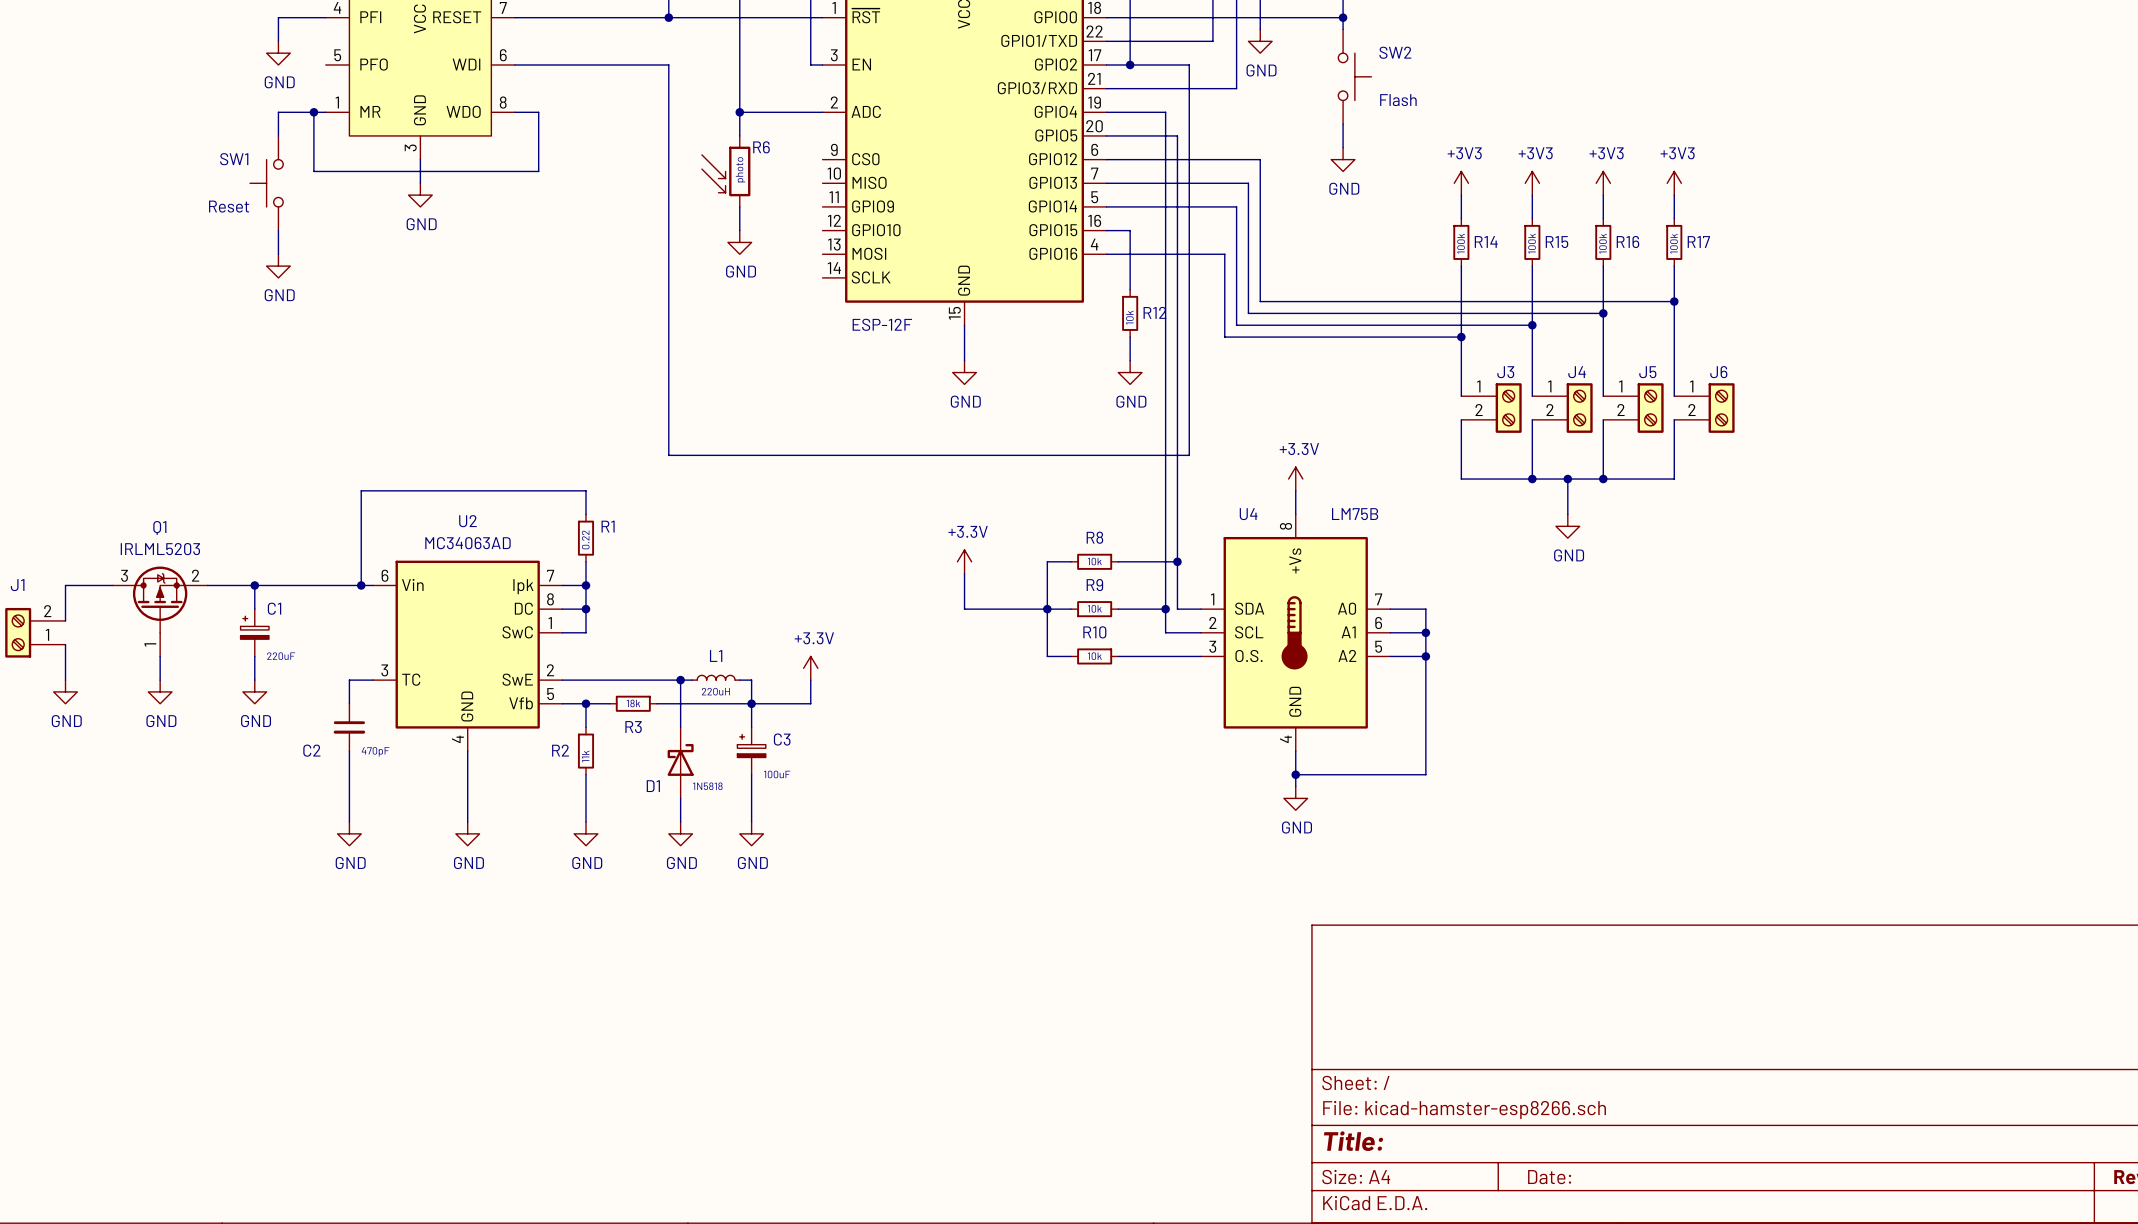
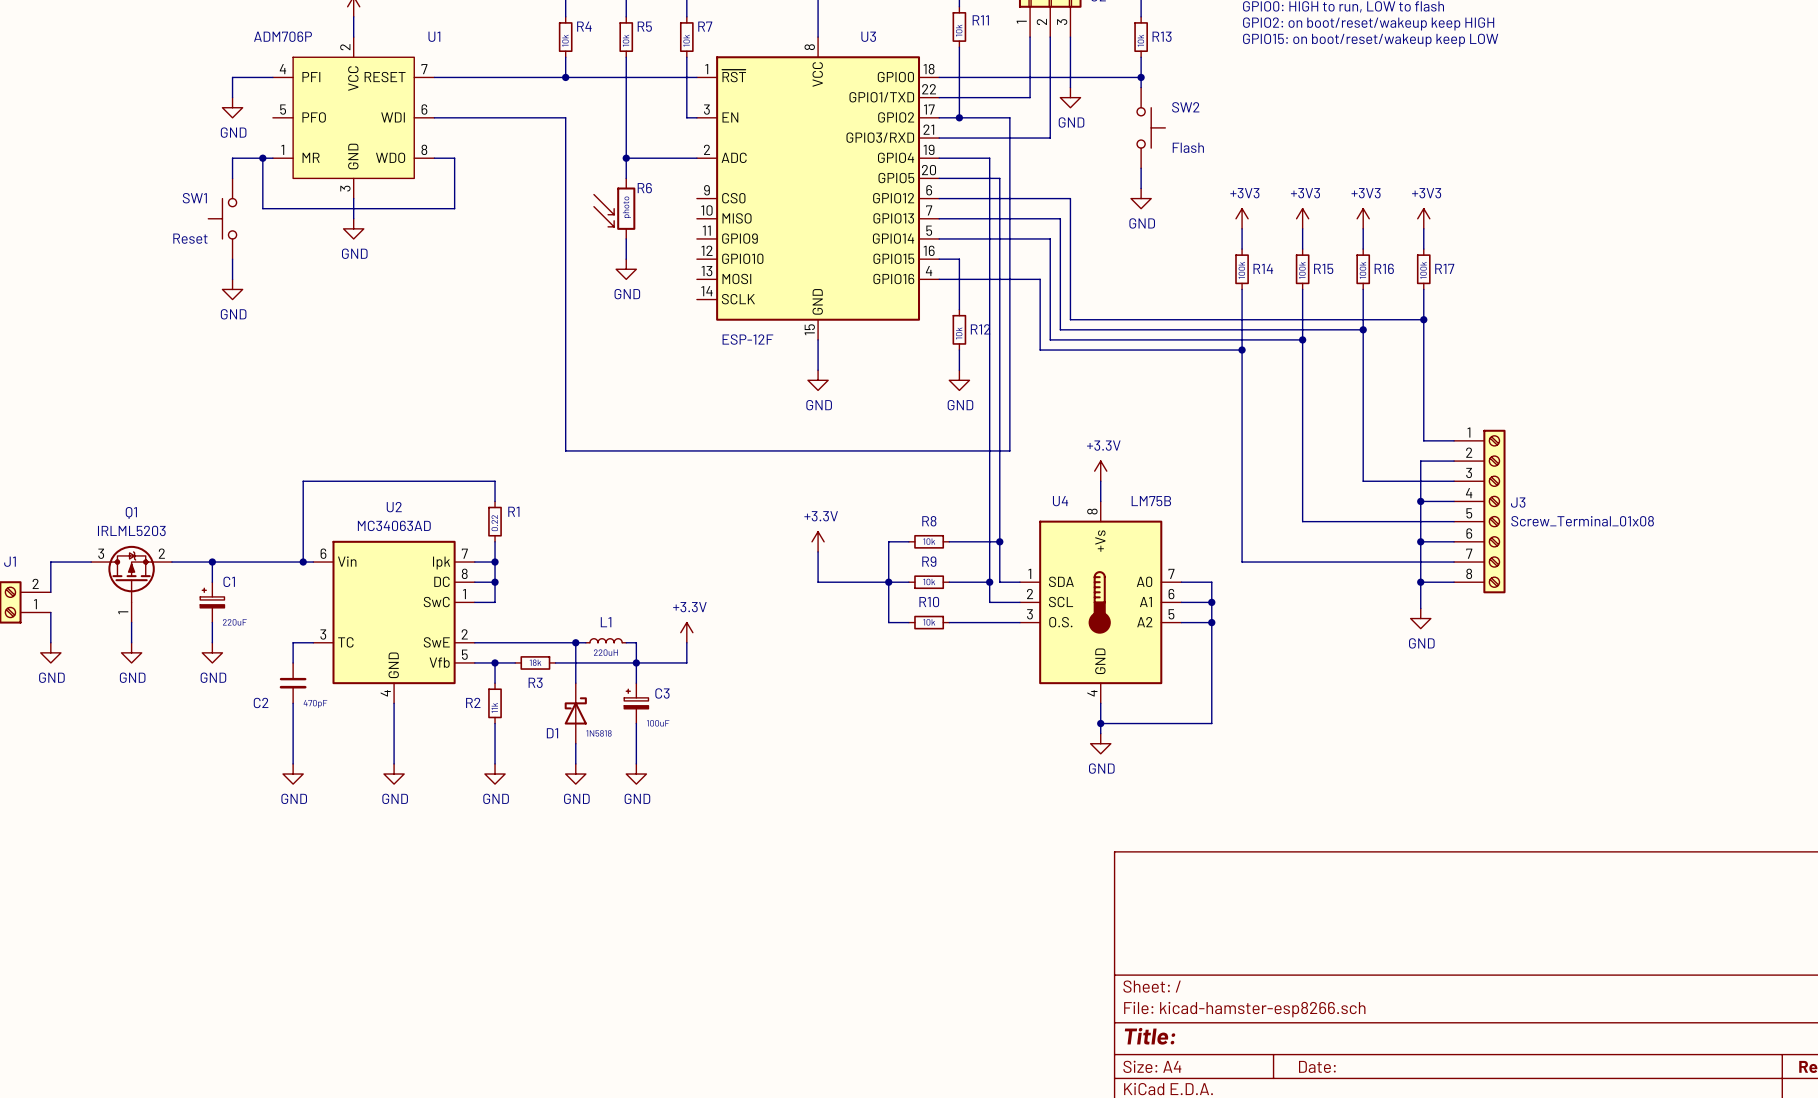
J3 name position: J3 (1505, 372) -> J3 (1518, 502)
J3 symbol: [1461, 383, 1522, 433] -> [1454, 429, 1506, 594]
wire: none -> (1242, 400) (1242, 420)
wire: none -> (1302, 400) (1302, 420)
wire: none -> (1363, 400) (1363, 420)
wire: none -> (1423, 400) (1423, 420)
J4: (1562, 408) -> none
J5: (1633, 408) -> none
J6: (1704, 408) -> none
wire: (1674, 443) (1674, 479) (1461, 479) -> (1454, 562) (1242, 562) (1242, 471)
wire: none -> (1423, 440) (1454, 440)
wire: none -> (1454, 461) (1420, 461) (1420, 608)
wire: none -> (1302, 471) (1302, 521) (1454, 521)
junction: (1532, 479) -> none
wire: (1567, 479) (1567, 514) -> none
junction: (1567, 479) -> none
wire: none -> (1363, 471) (1363, 481) (1454, 481)
junction: (1603, 479) -> none
wire: none -> (1420, 501) (1454, 501)
junction: none -> (1420, 501)
power symbol position: GND (1567, 526) -> GND (1420, 618)
J3 value: none -> Screw_Terminal_01x08 (1582, 521)
wire: none -> (1420, 541) (1454, 541)
junction: none -> (1420, 541)
wire: none -> (1420, 582) (1454, 582)
junction: none -> (1420, 582)

